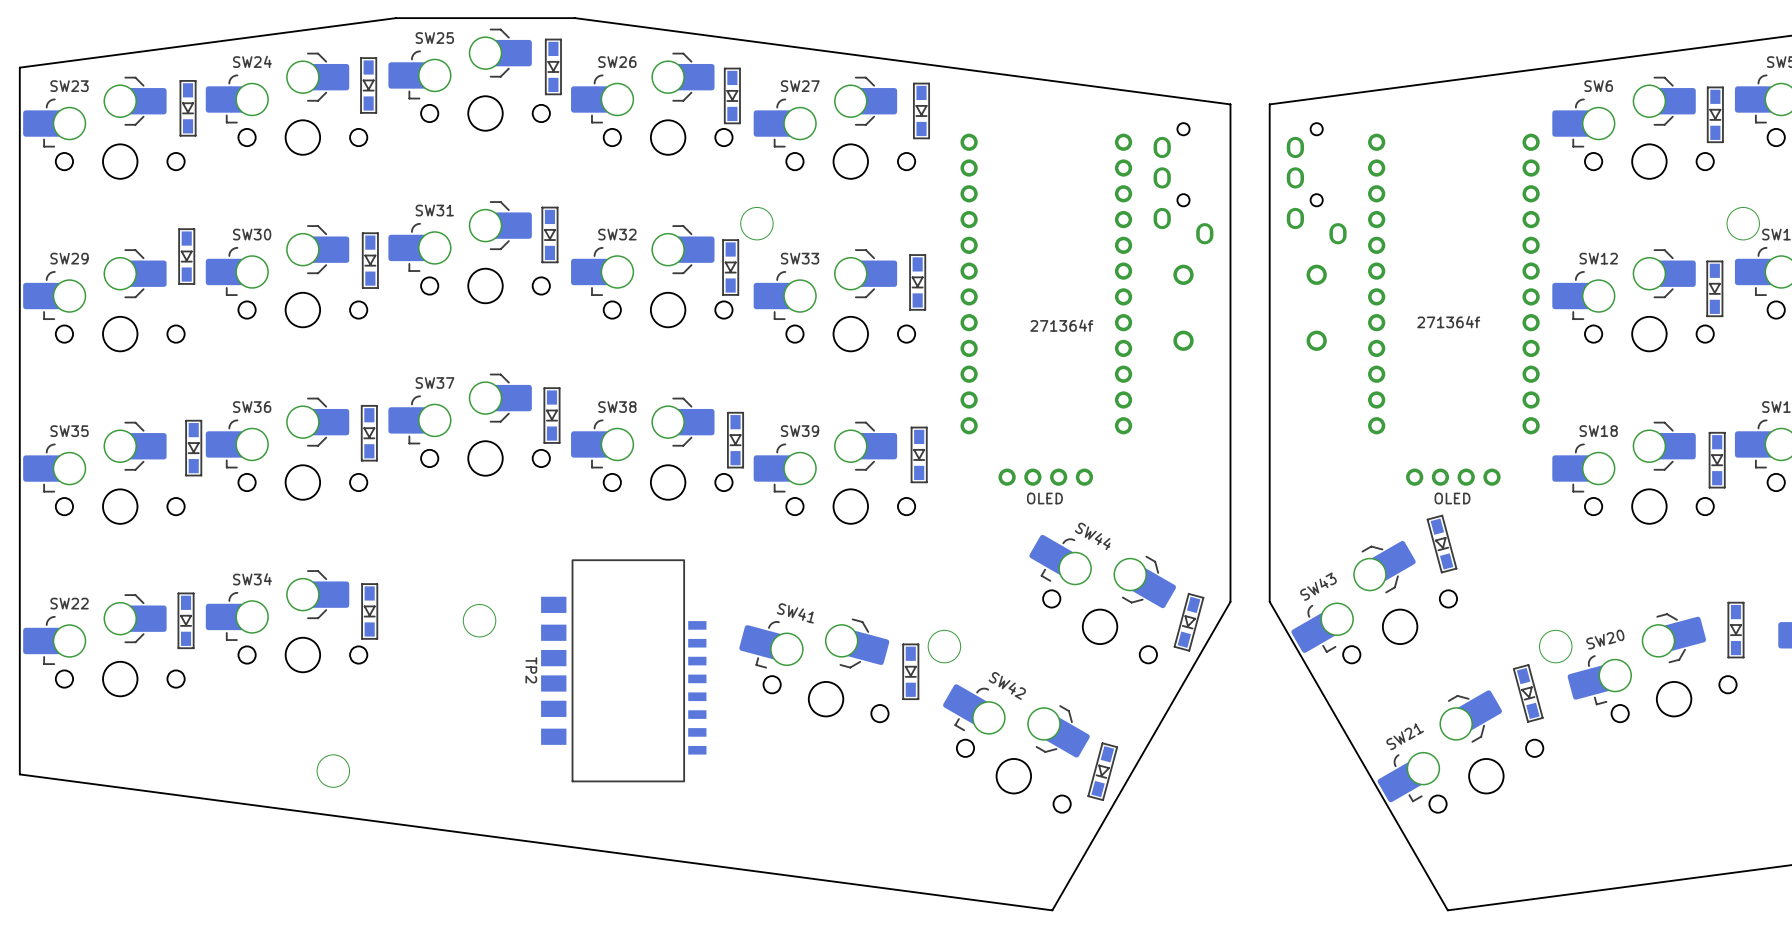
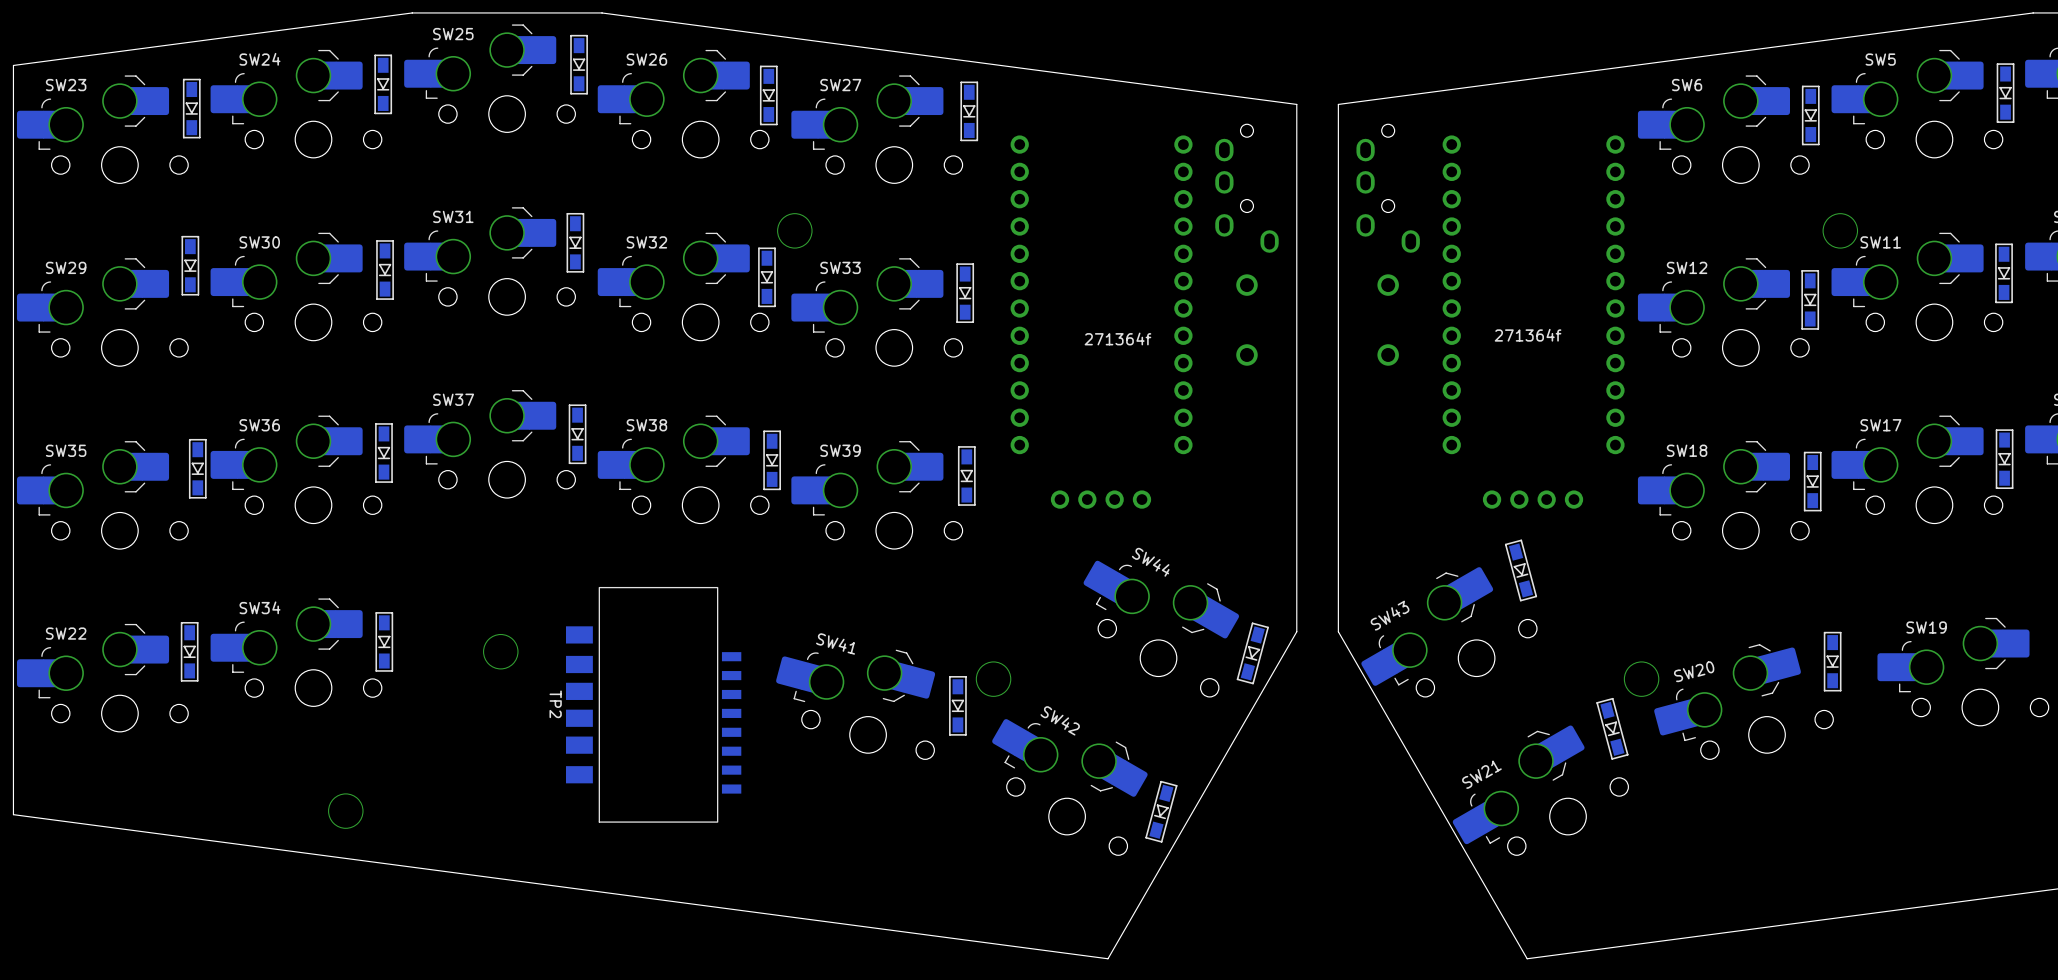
part text: OLED (1044, 498) -> none
part text: OLED (1452, 498) -> none

